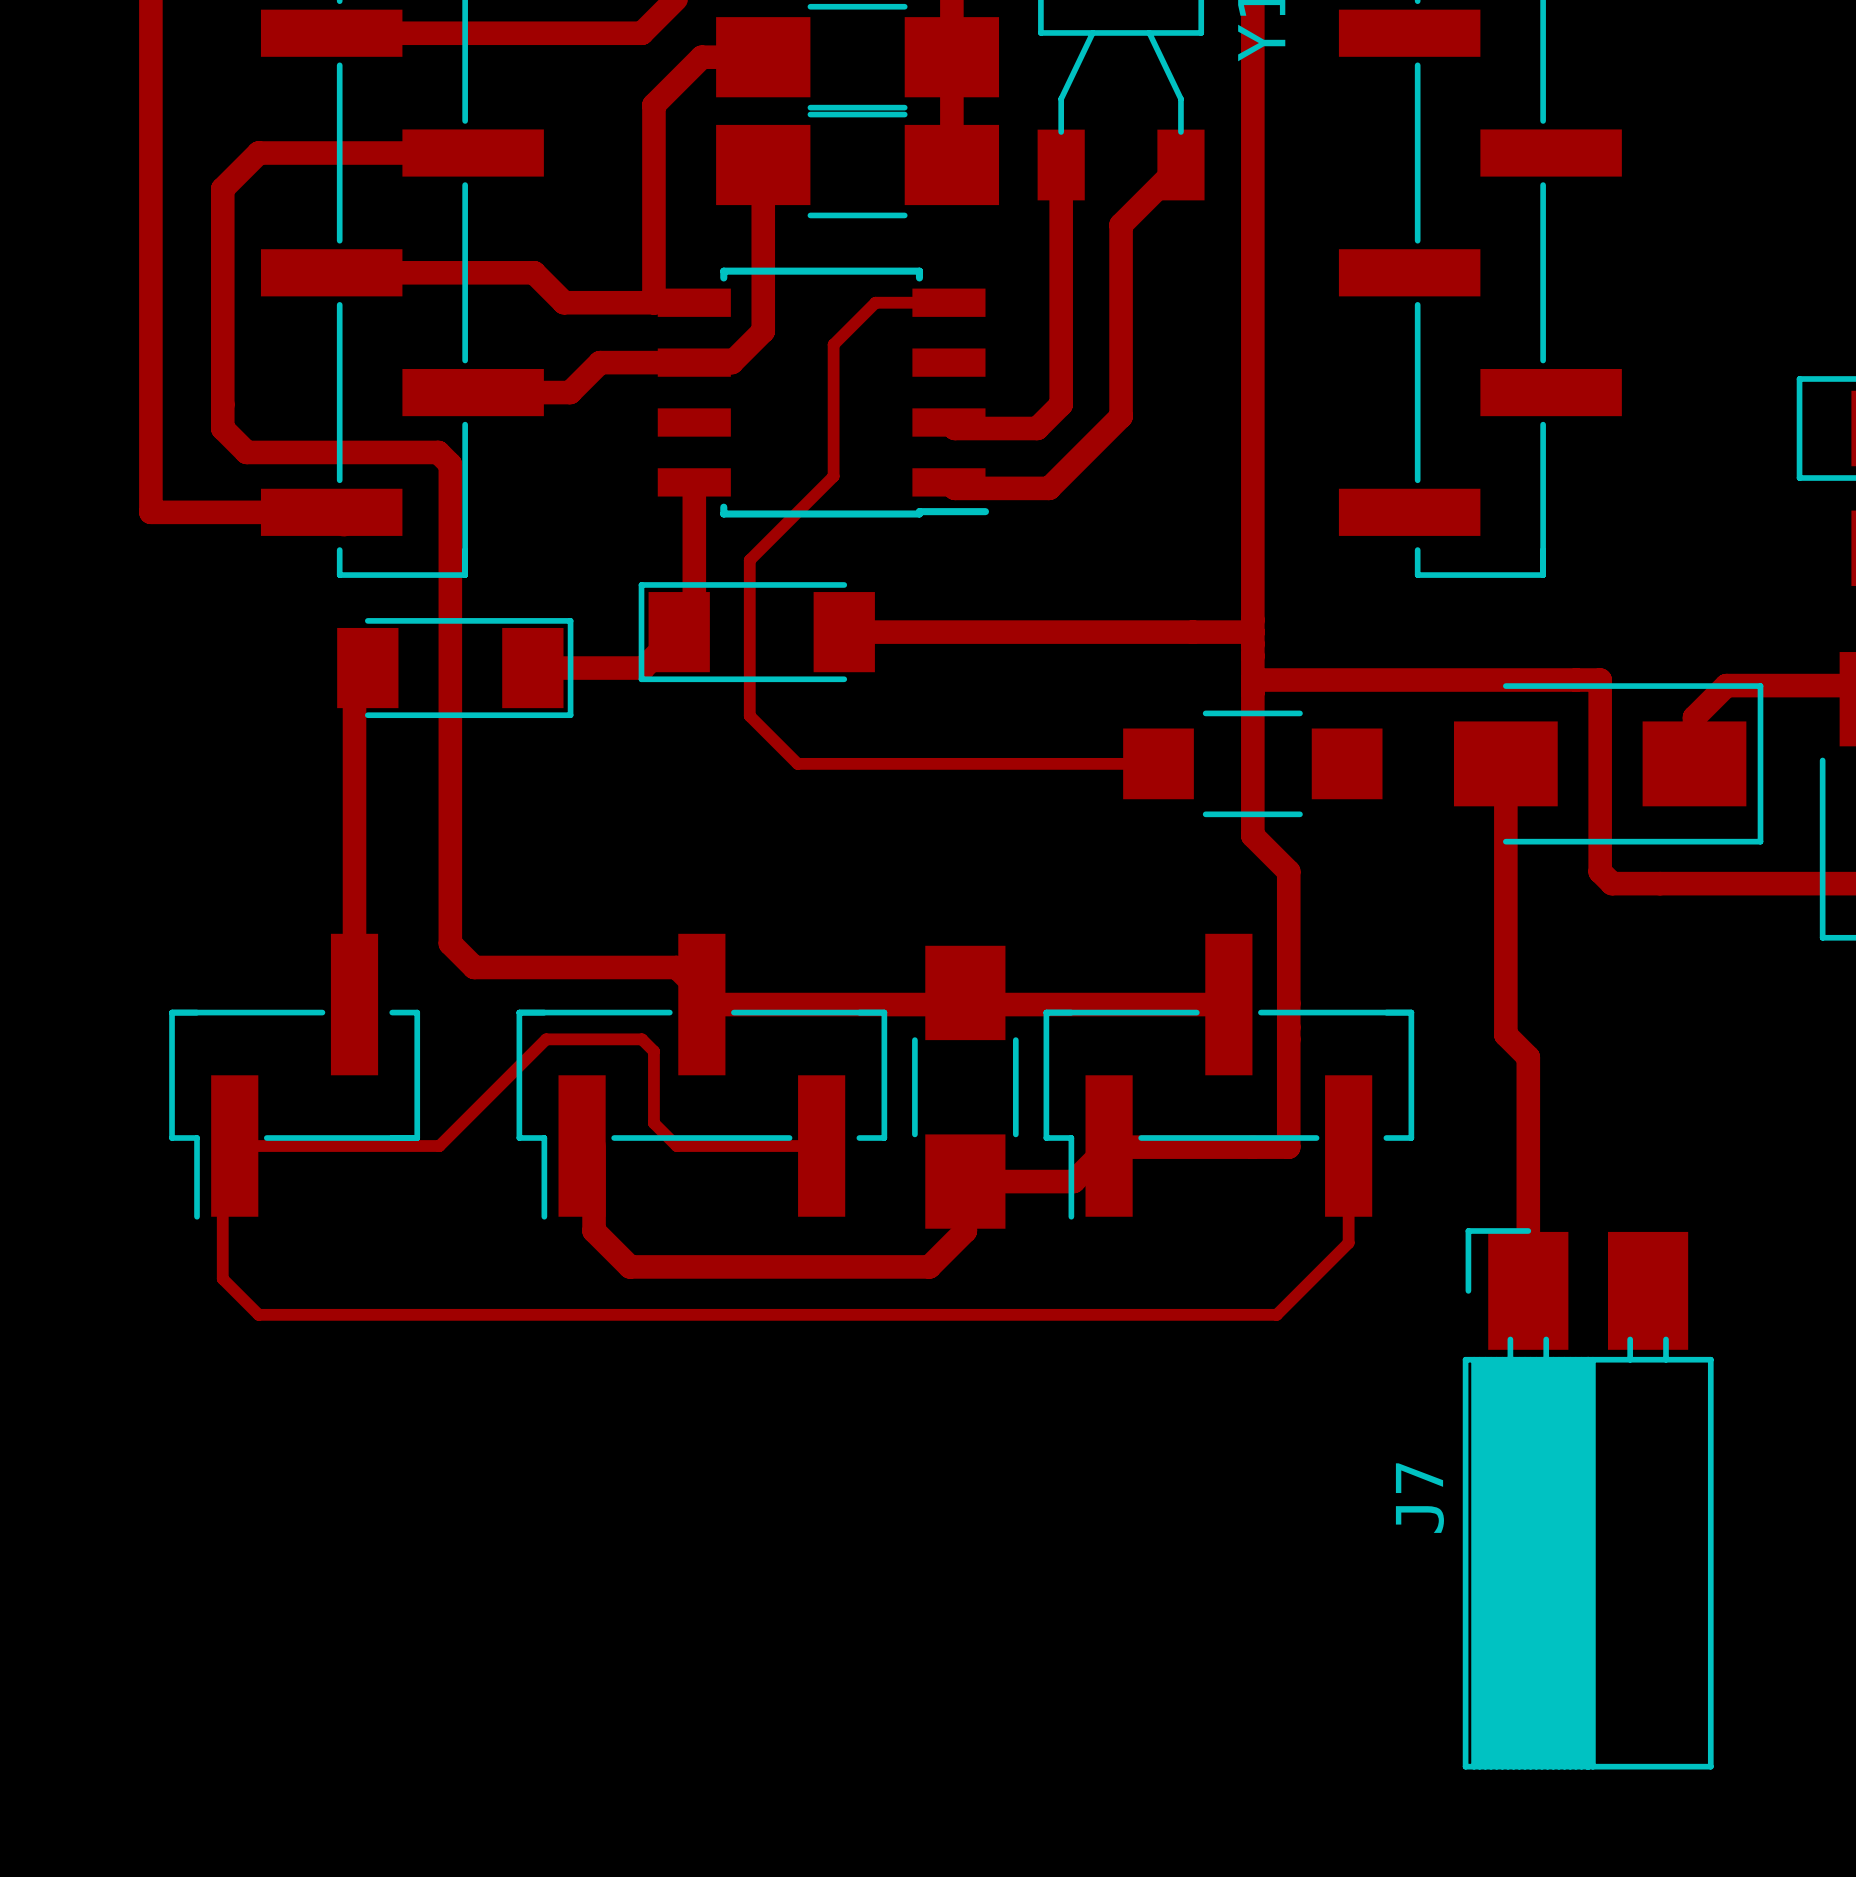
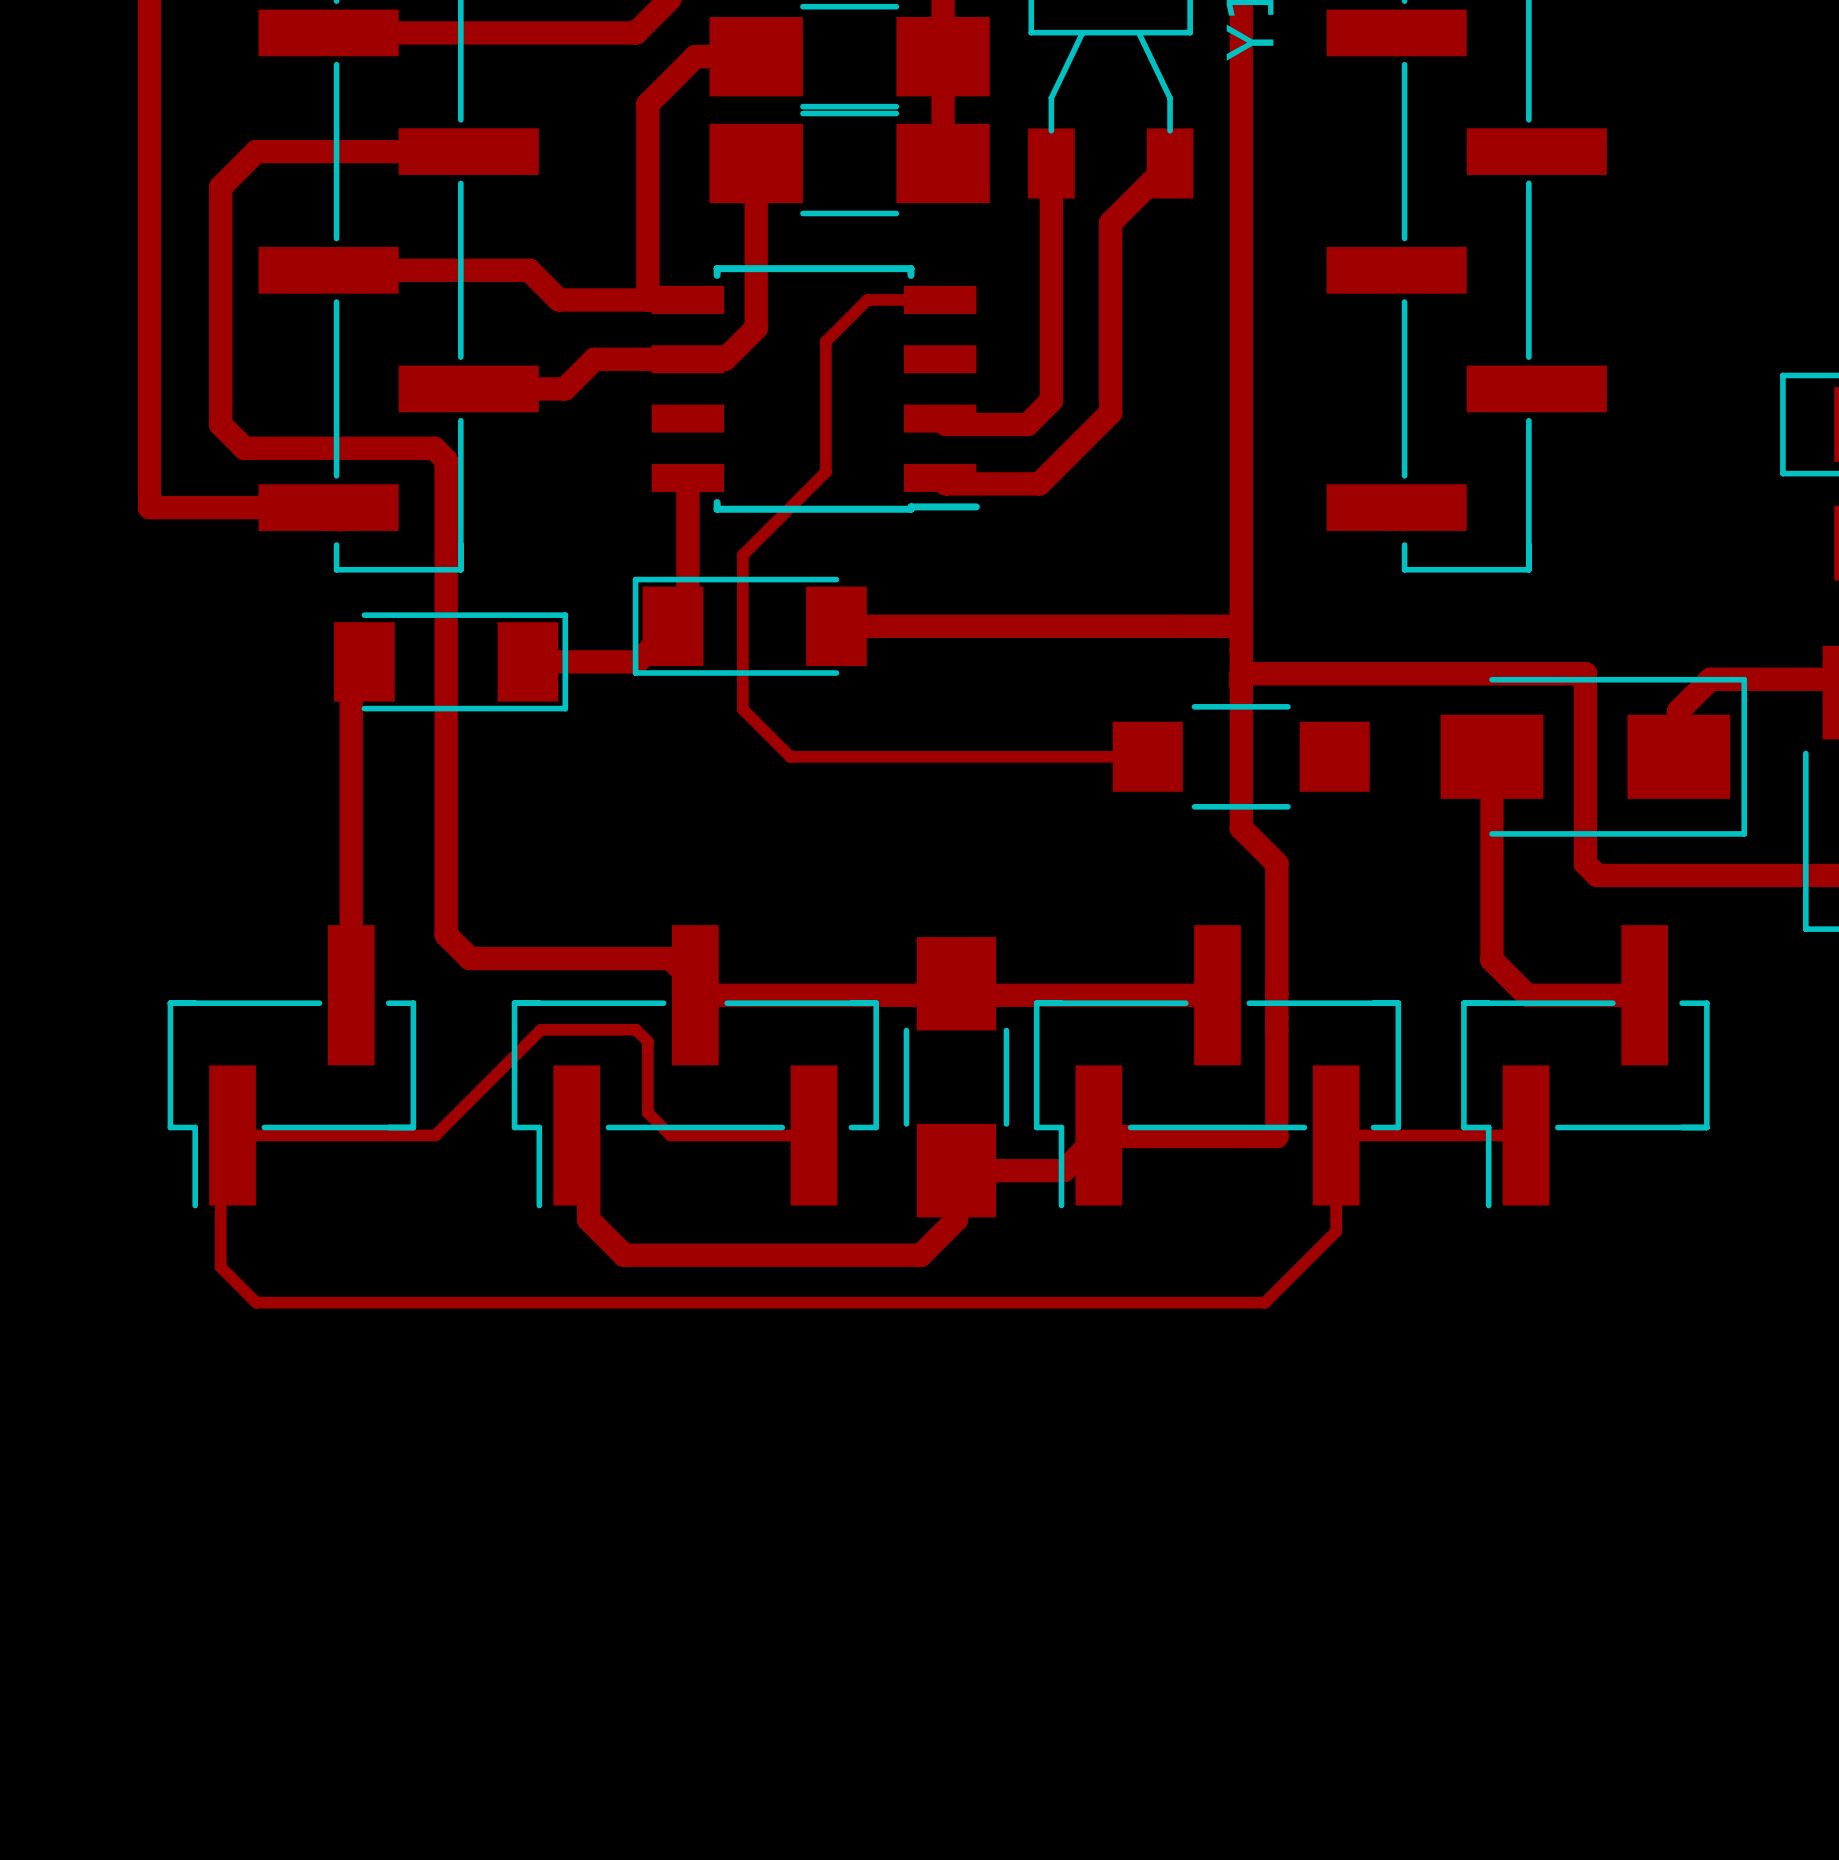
track: (1505, 968) (1505, 1034) (1528, 1057) (1528, 1278) -> (1491, 960) (1527, 995) (1644, 995)
part: none -> (1585, 1066)
track: none -> (1336, 1135) (1526, 1135)
J7: (1588, 1498) -> none

